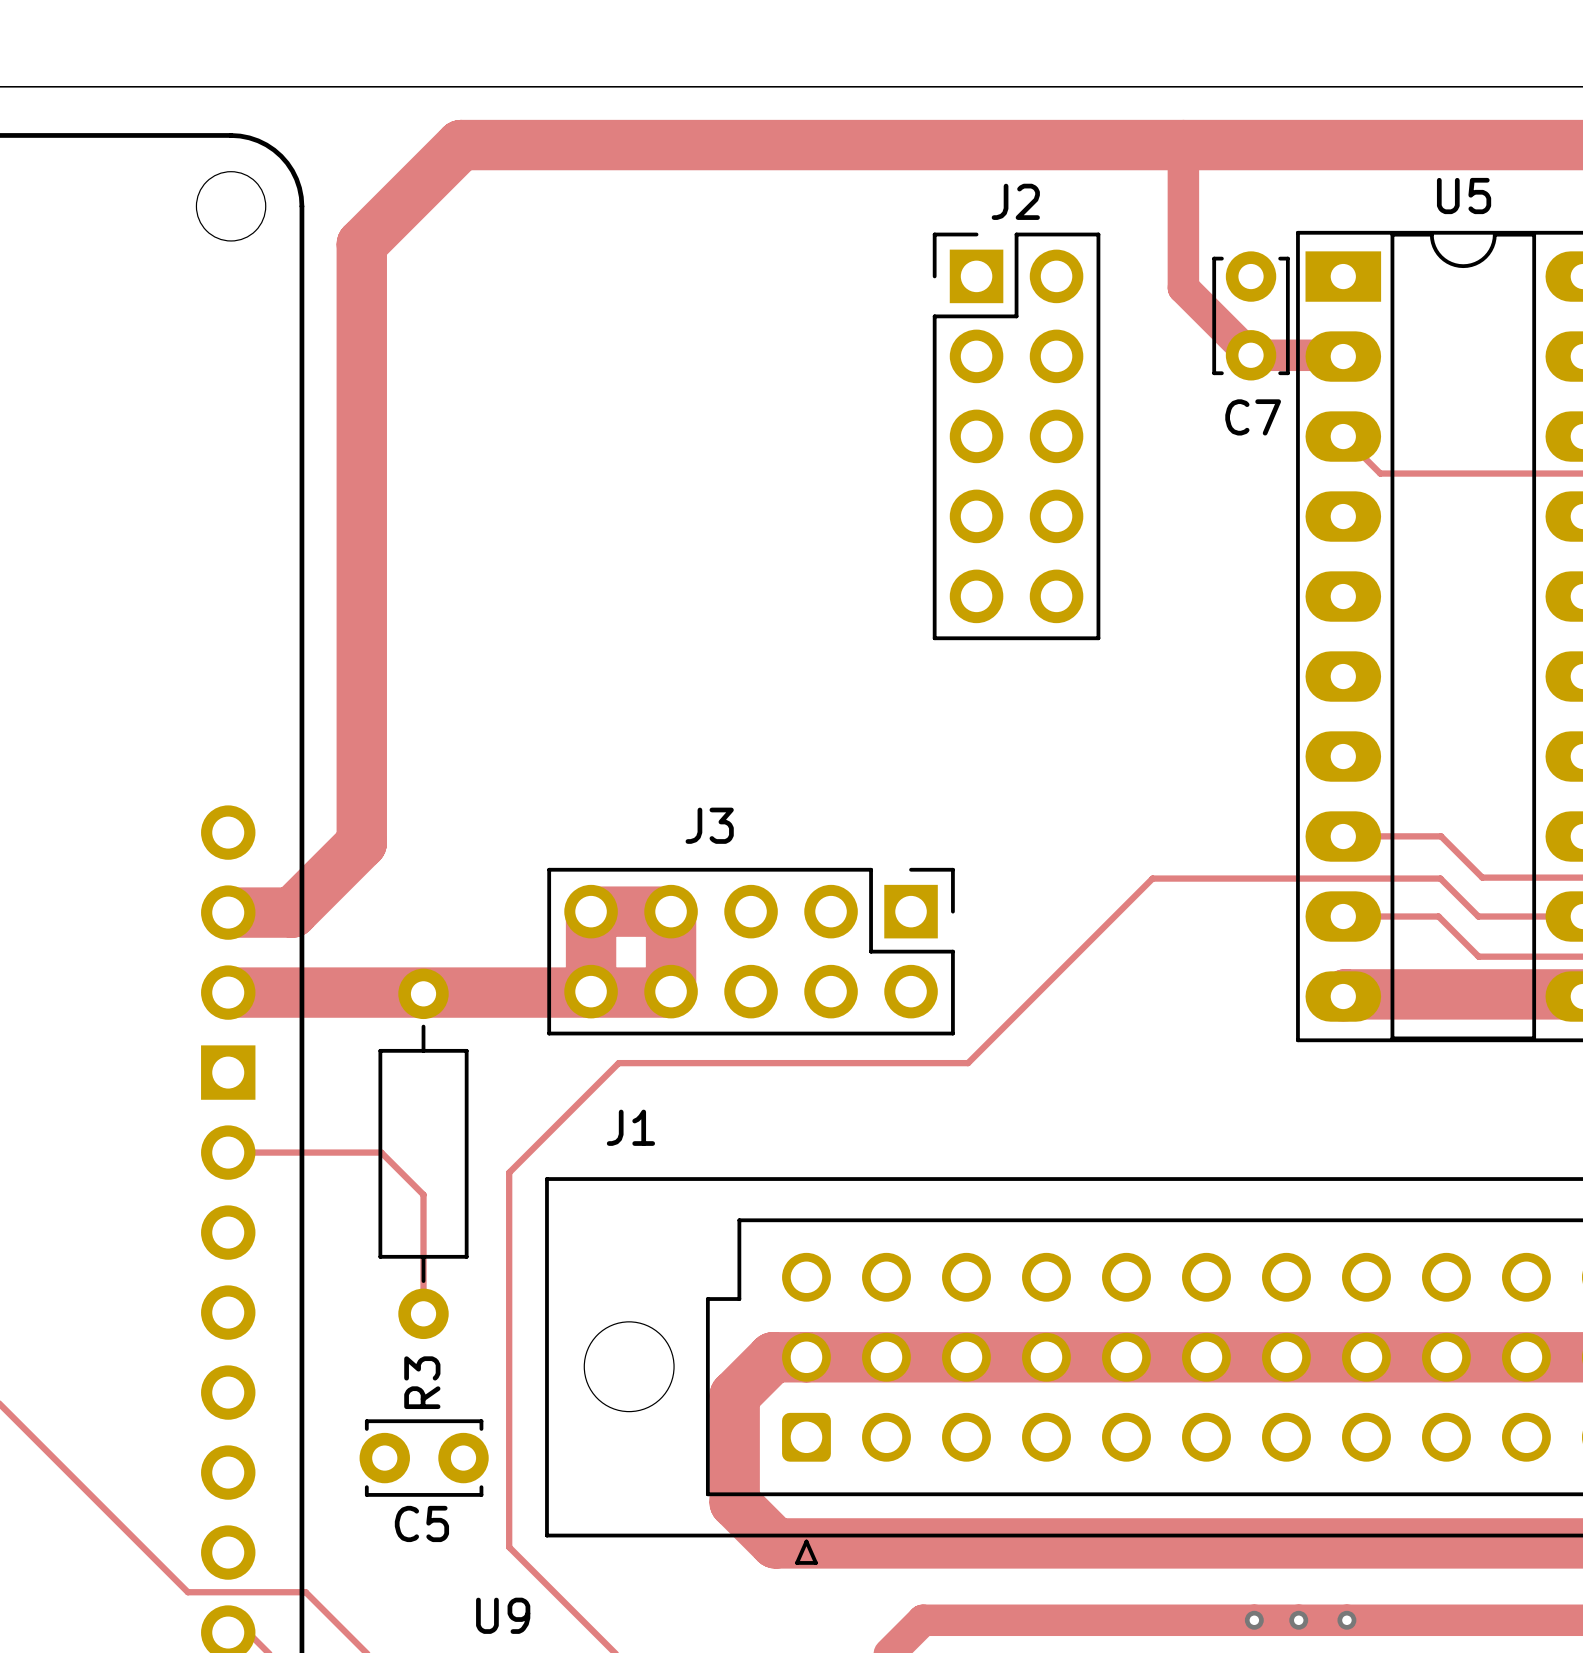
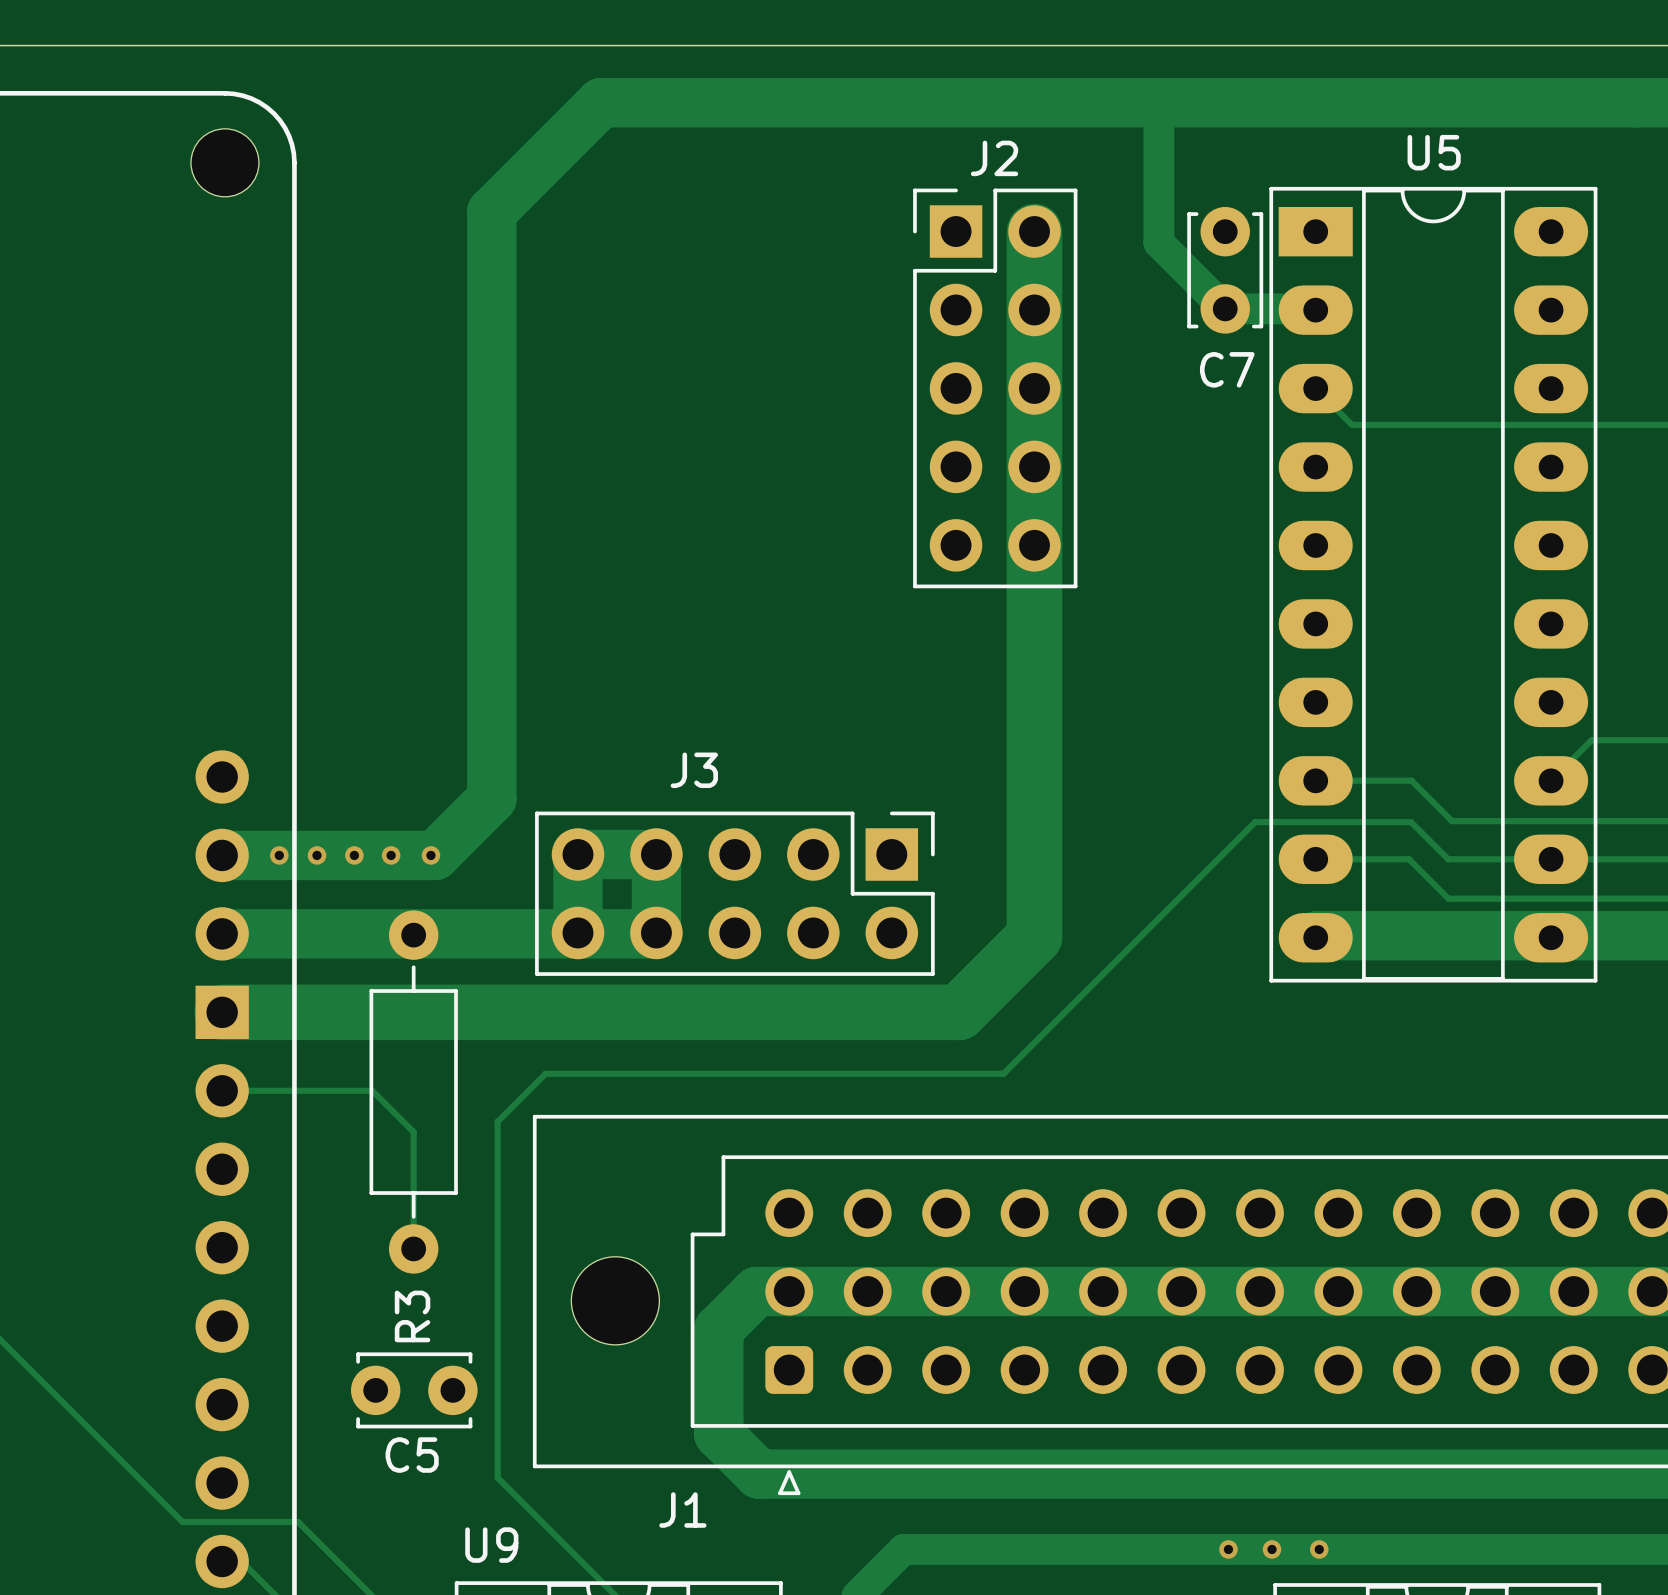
track: (614, 145) (460, 145) (361, 244) (361, 842) (292, 912) -> (601, 102) (491, 212) (491, 798) (434, 855) (284, 855)
track: none -> (1034, 231) (1034, 936) (958, 1012) (222, 1012)
track: (1281, 878) (1152, 878) (968, 1063) (618, 1063) (509, 1172) (509, 1184) -> (1255, 822) (1003, 1073) (545, 1073) (497, 1121)
via: none -> (279, 855)
via: none -> (317, 855)
via: none -> (354, 855)
via: none -> (391, 855)
via: none -> (430, 855)
J1 name position: J1 (630, 1127) -> J1 (682, 1510)

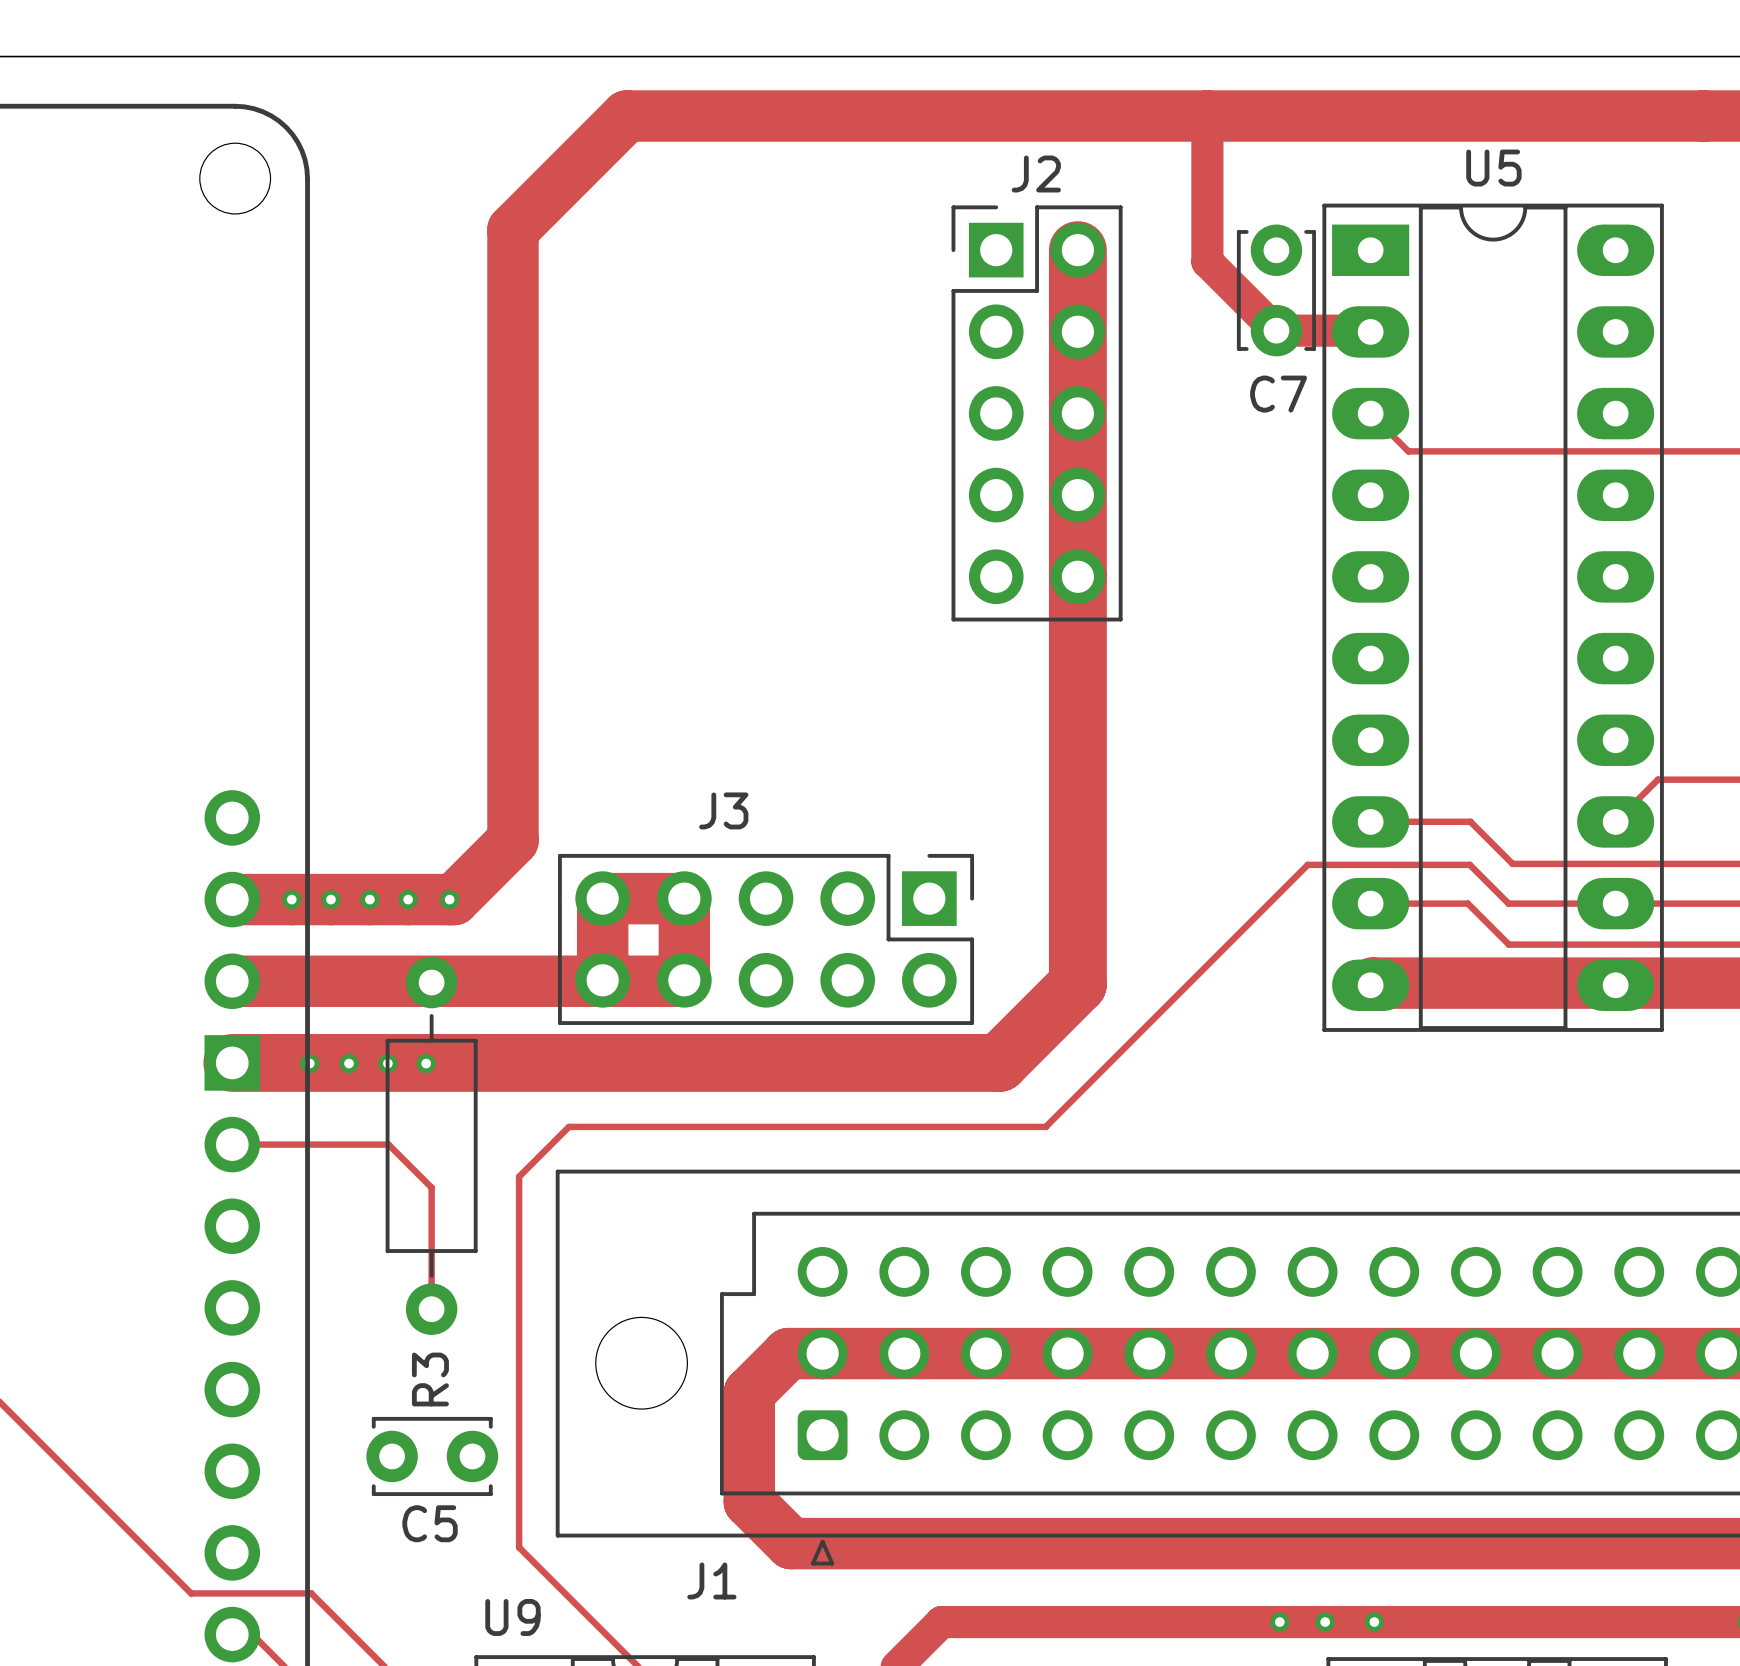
via: none -> (309, 1063)
via: none -> (349, 1063)
via: none -> (387, 1063)
via: none -> (426, 1063)

